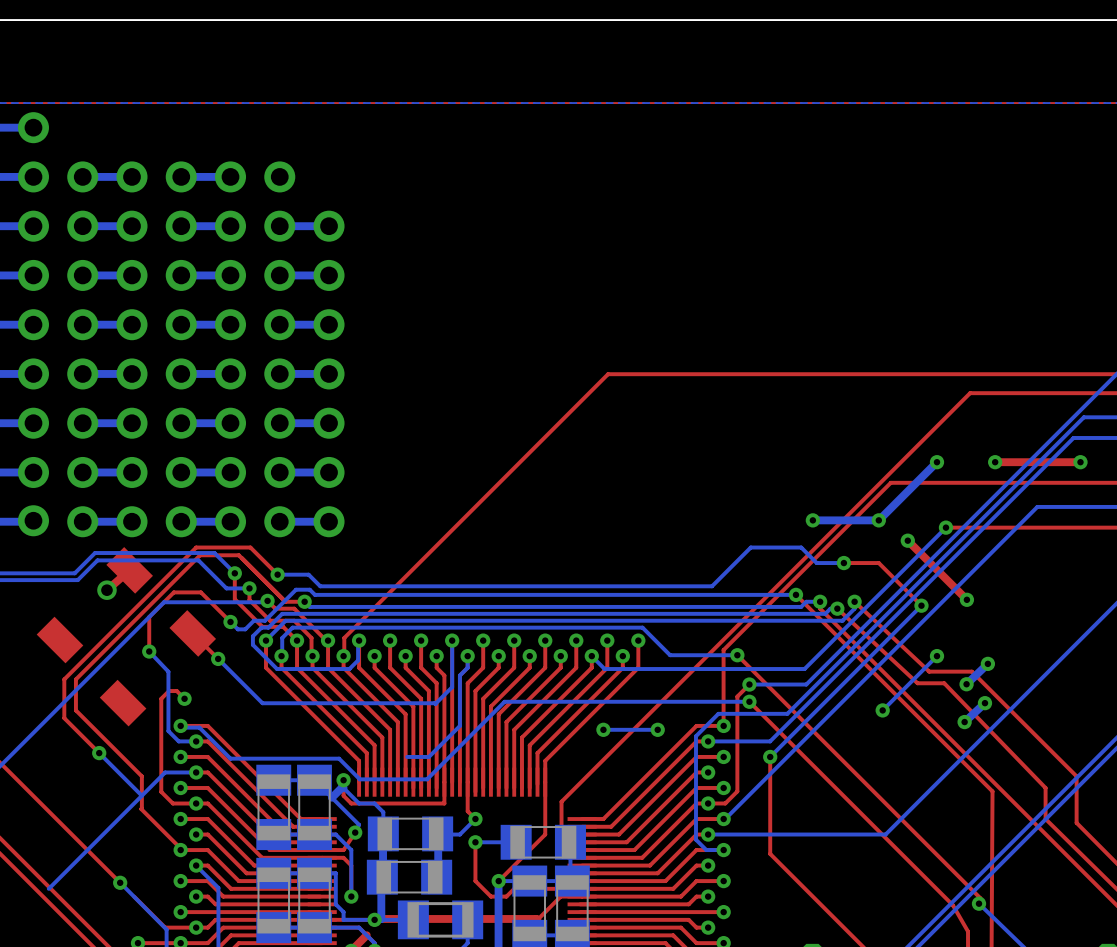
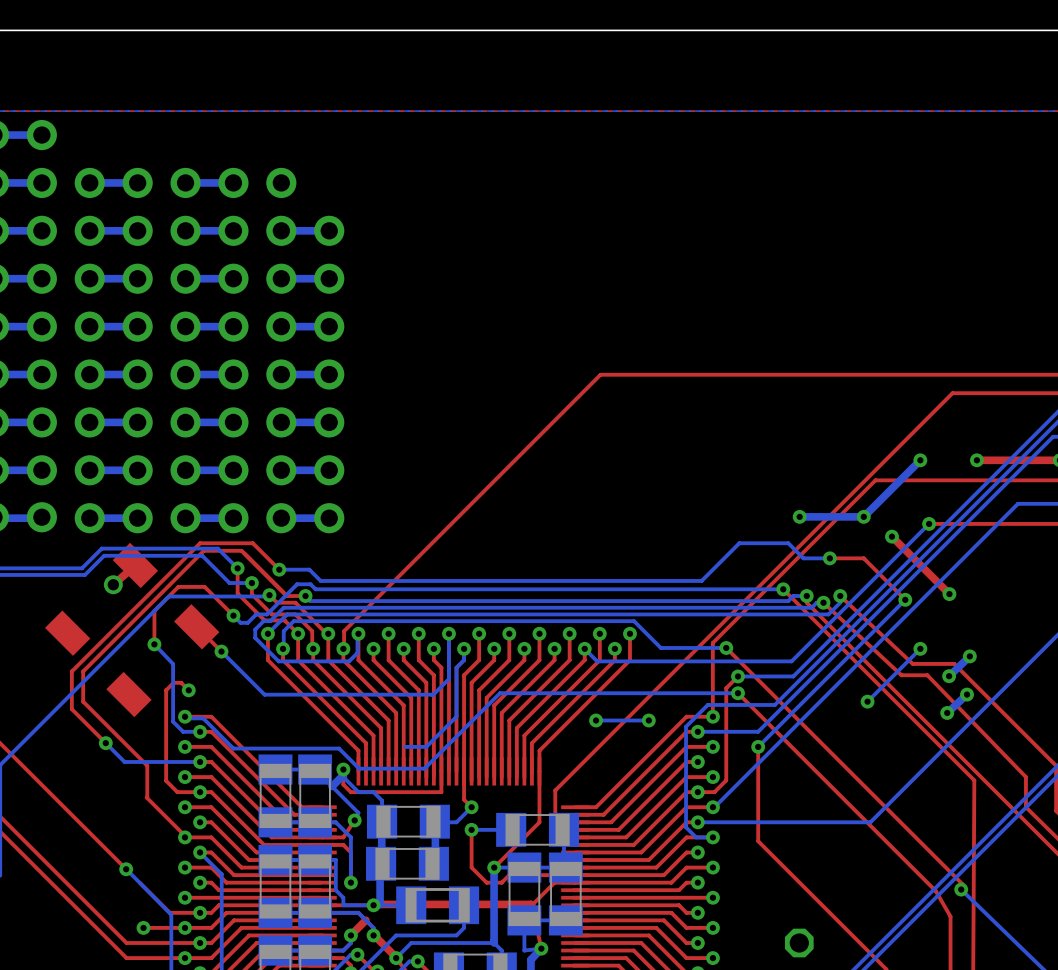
bottom track: (118, 772) (141, 795) -> (124, 761) (169, 761)
bottom track: (165, 772) (48, 888) -> none

